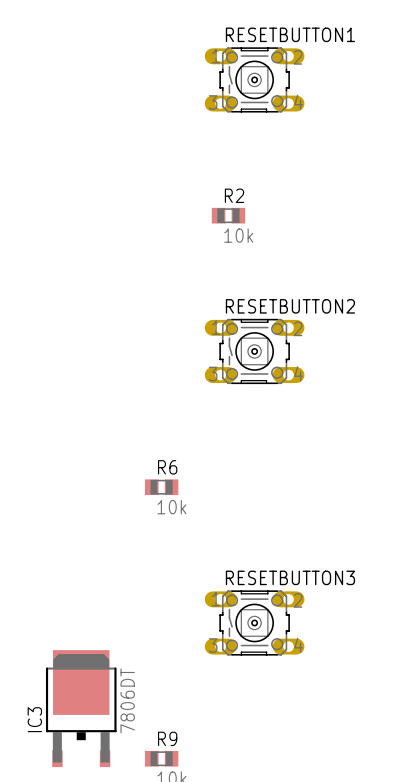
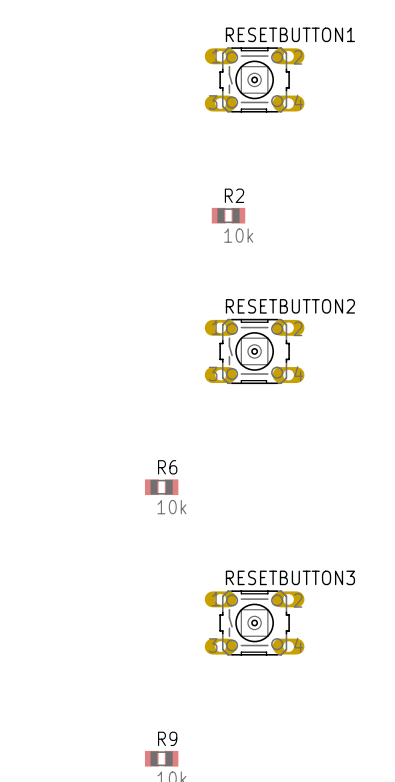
IC3: 7806DT (81, 708) -> none

